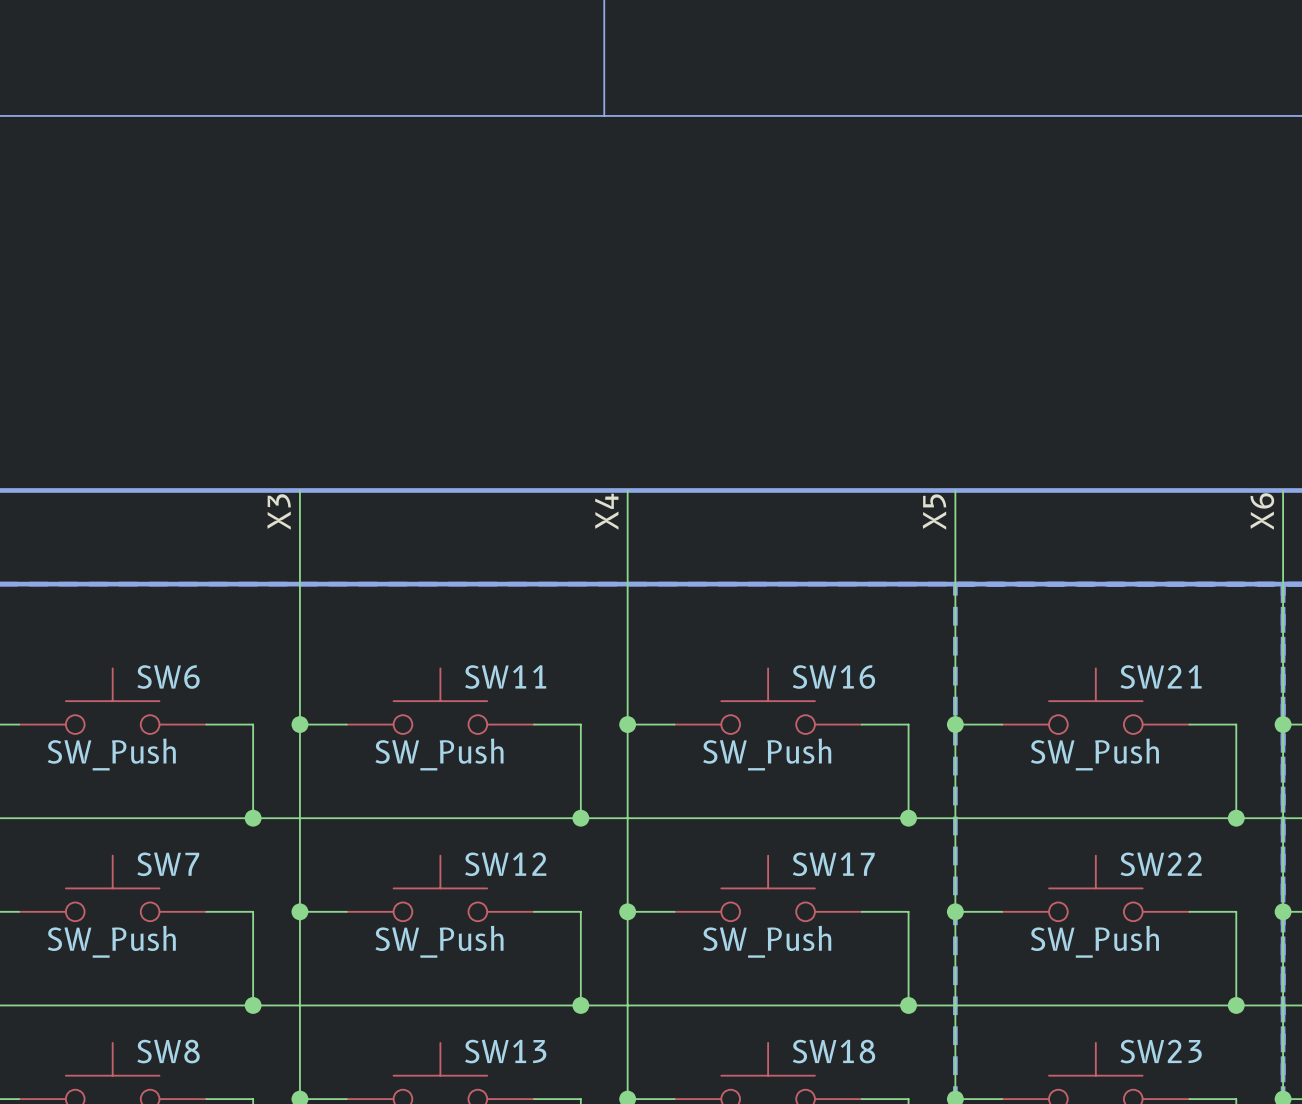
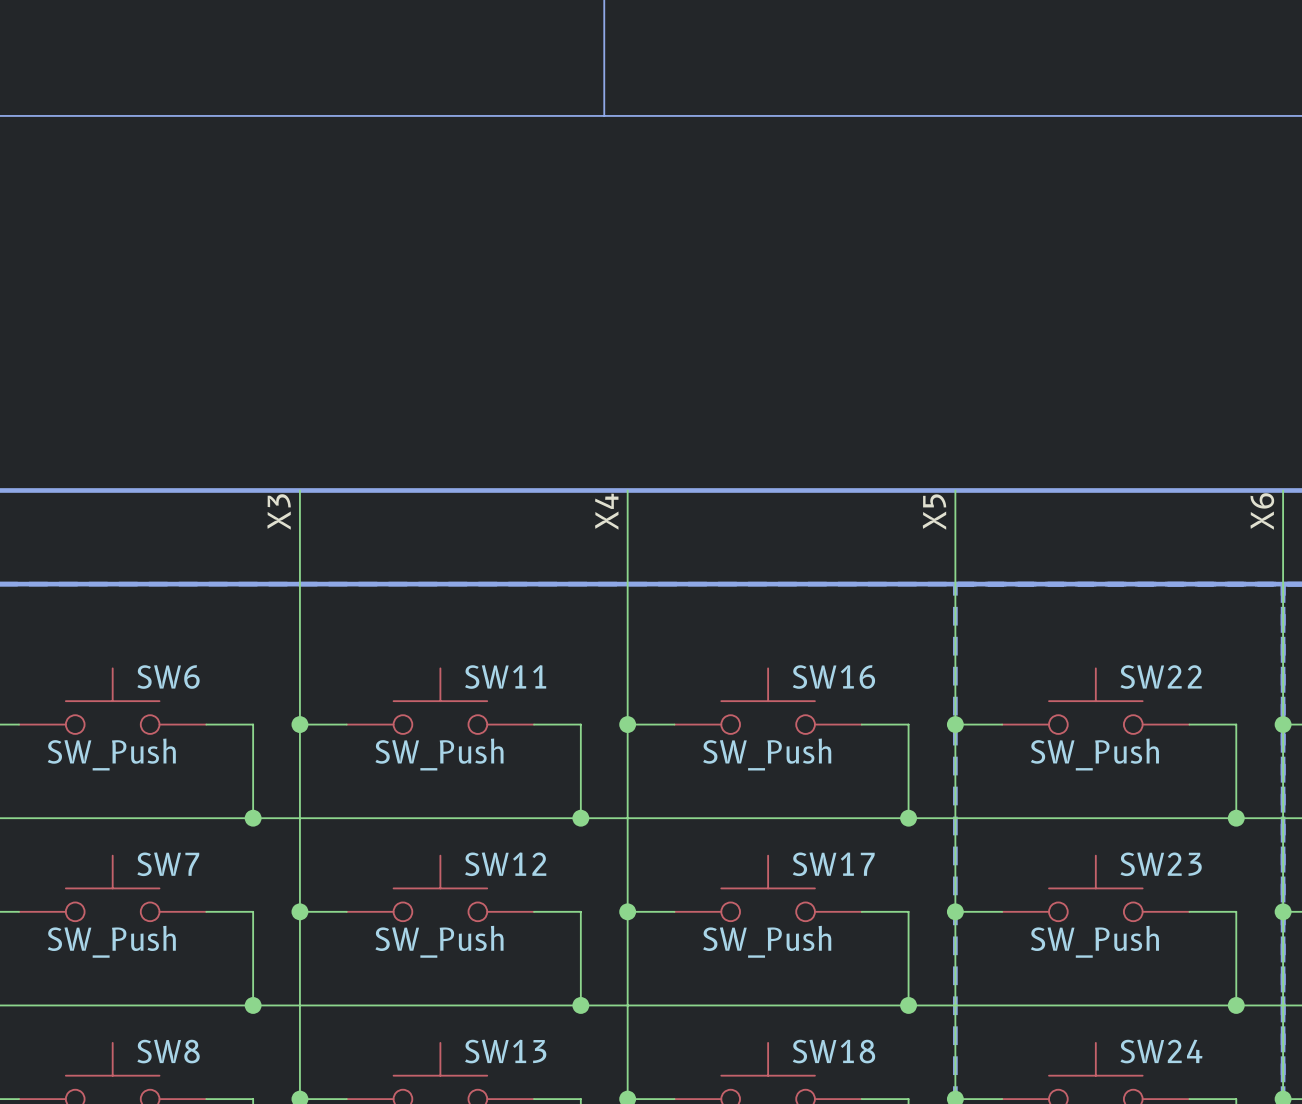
SW21 name: SW21 (1161, 677) -> SW22 (1161, 677)
SW22 name: SW22 (1161, 864) -> SW23 (1161, 864)
SW23 name: SW23 (1161, 1051) -> SW24 (1161, 1051)

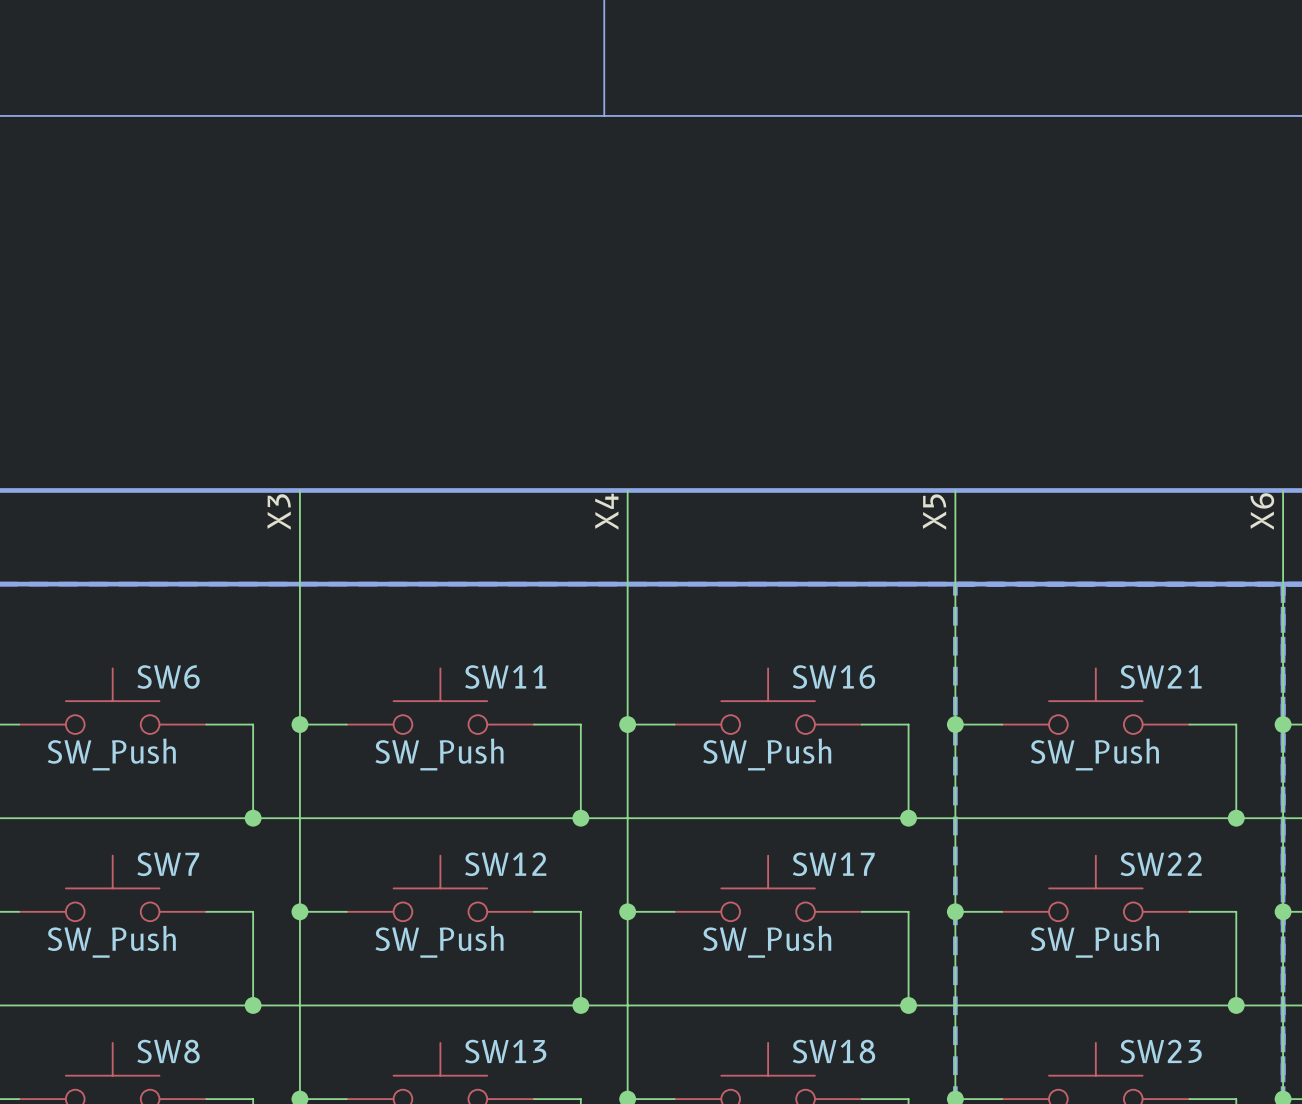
SW22 name: SW22 (1161, 677) -> SW21 (1161, 677)
SW23 name: SW23 (1161, 864) -> SW22 (1161, 864)
SW24 name: SW24 (1161, 1051) -> SW23 (1161, 1051)

